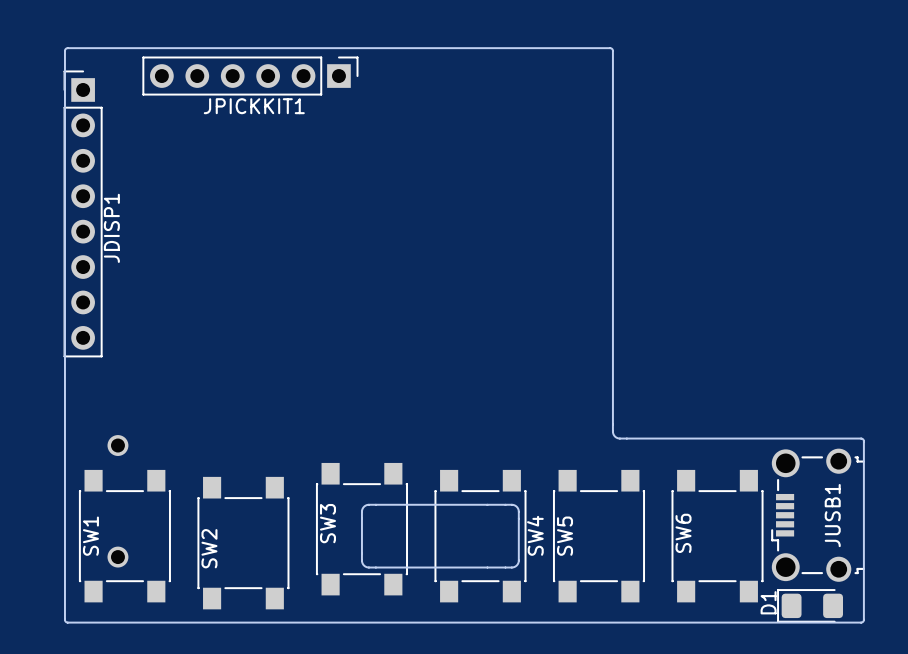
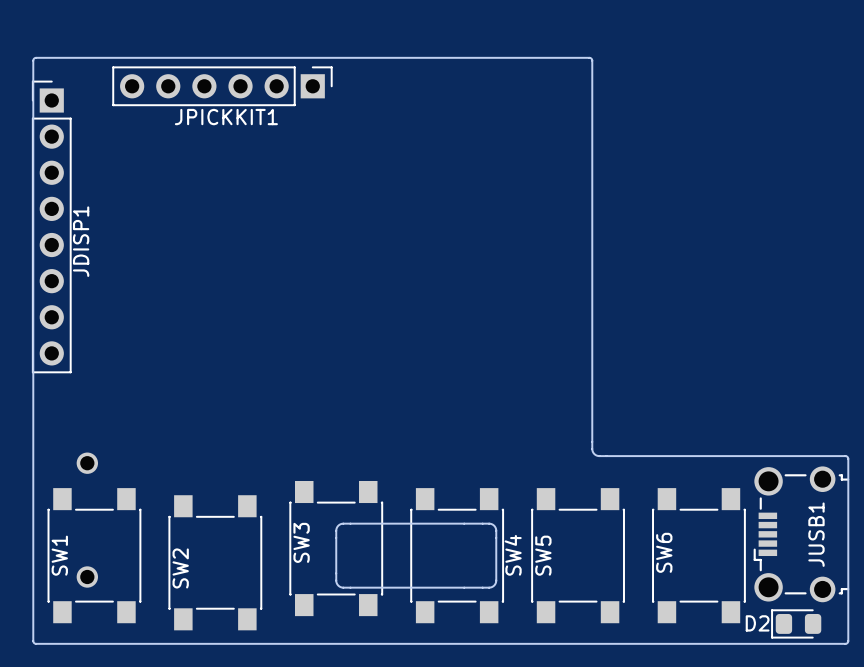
D2: none -> (796, 623)
D1: (810, 605) -> none

